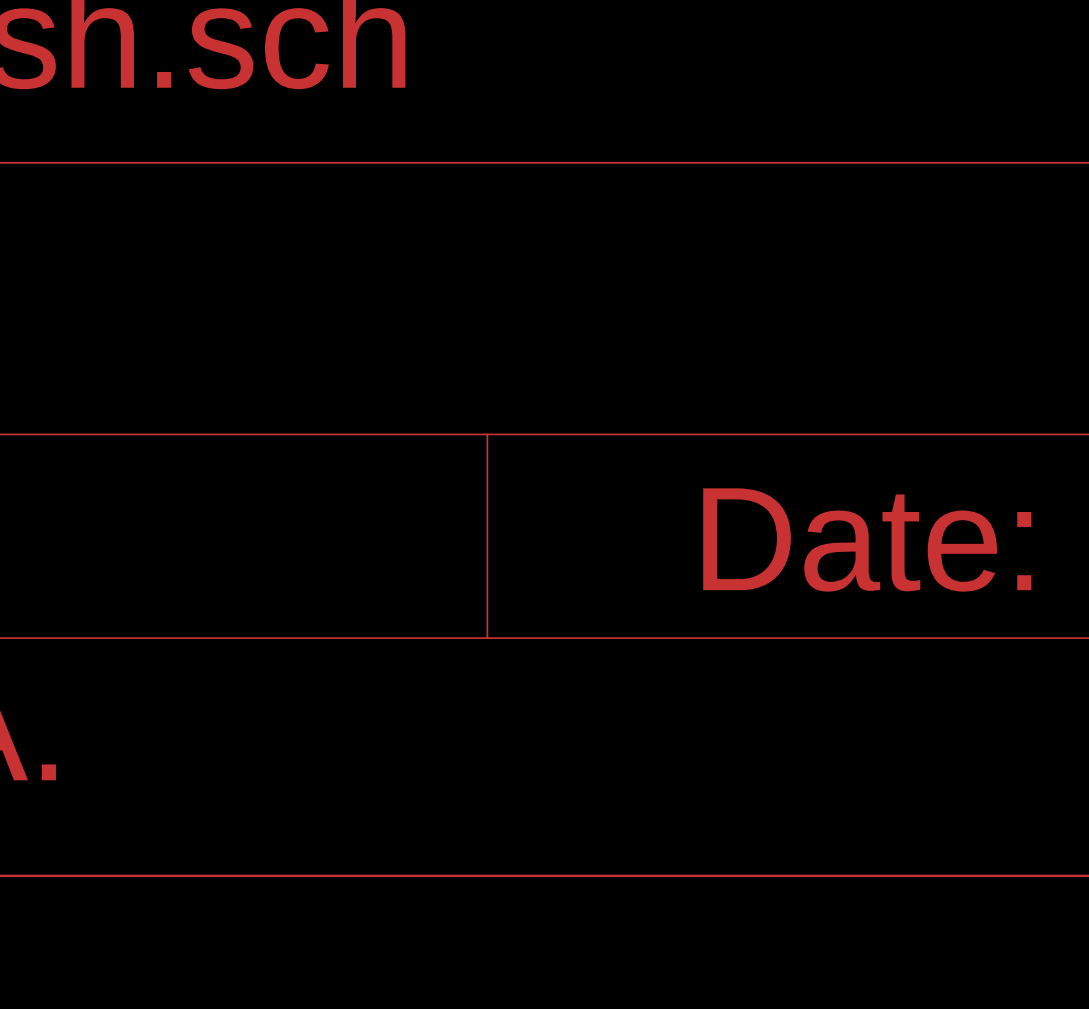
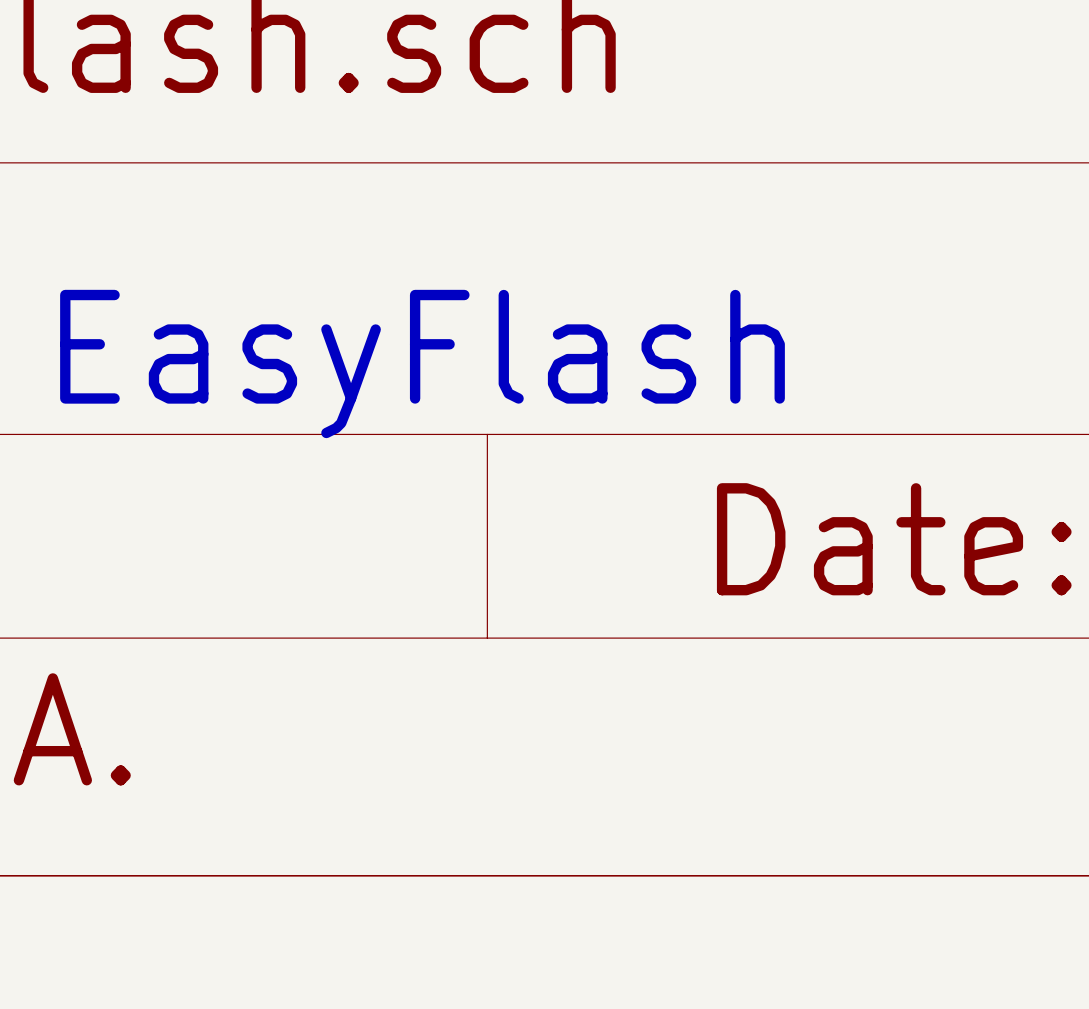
text: none -> EasyFlash (422, 364)

